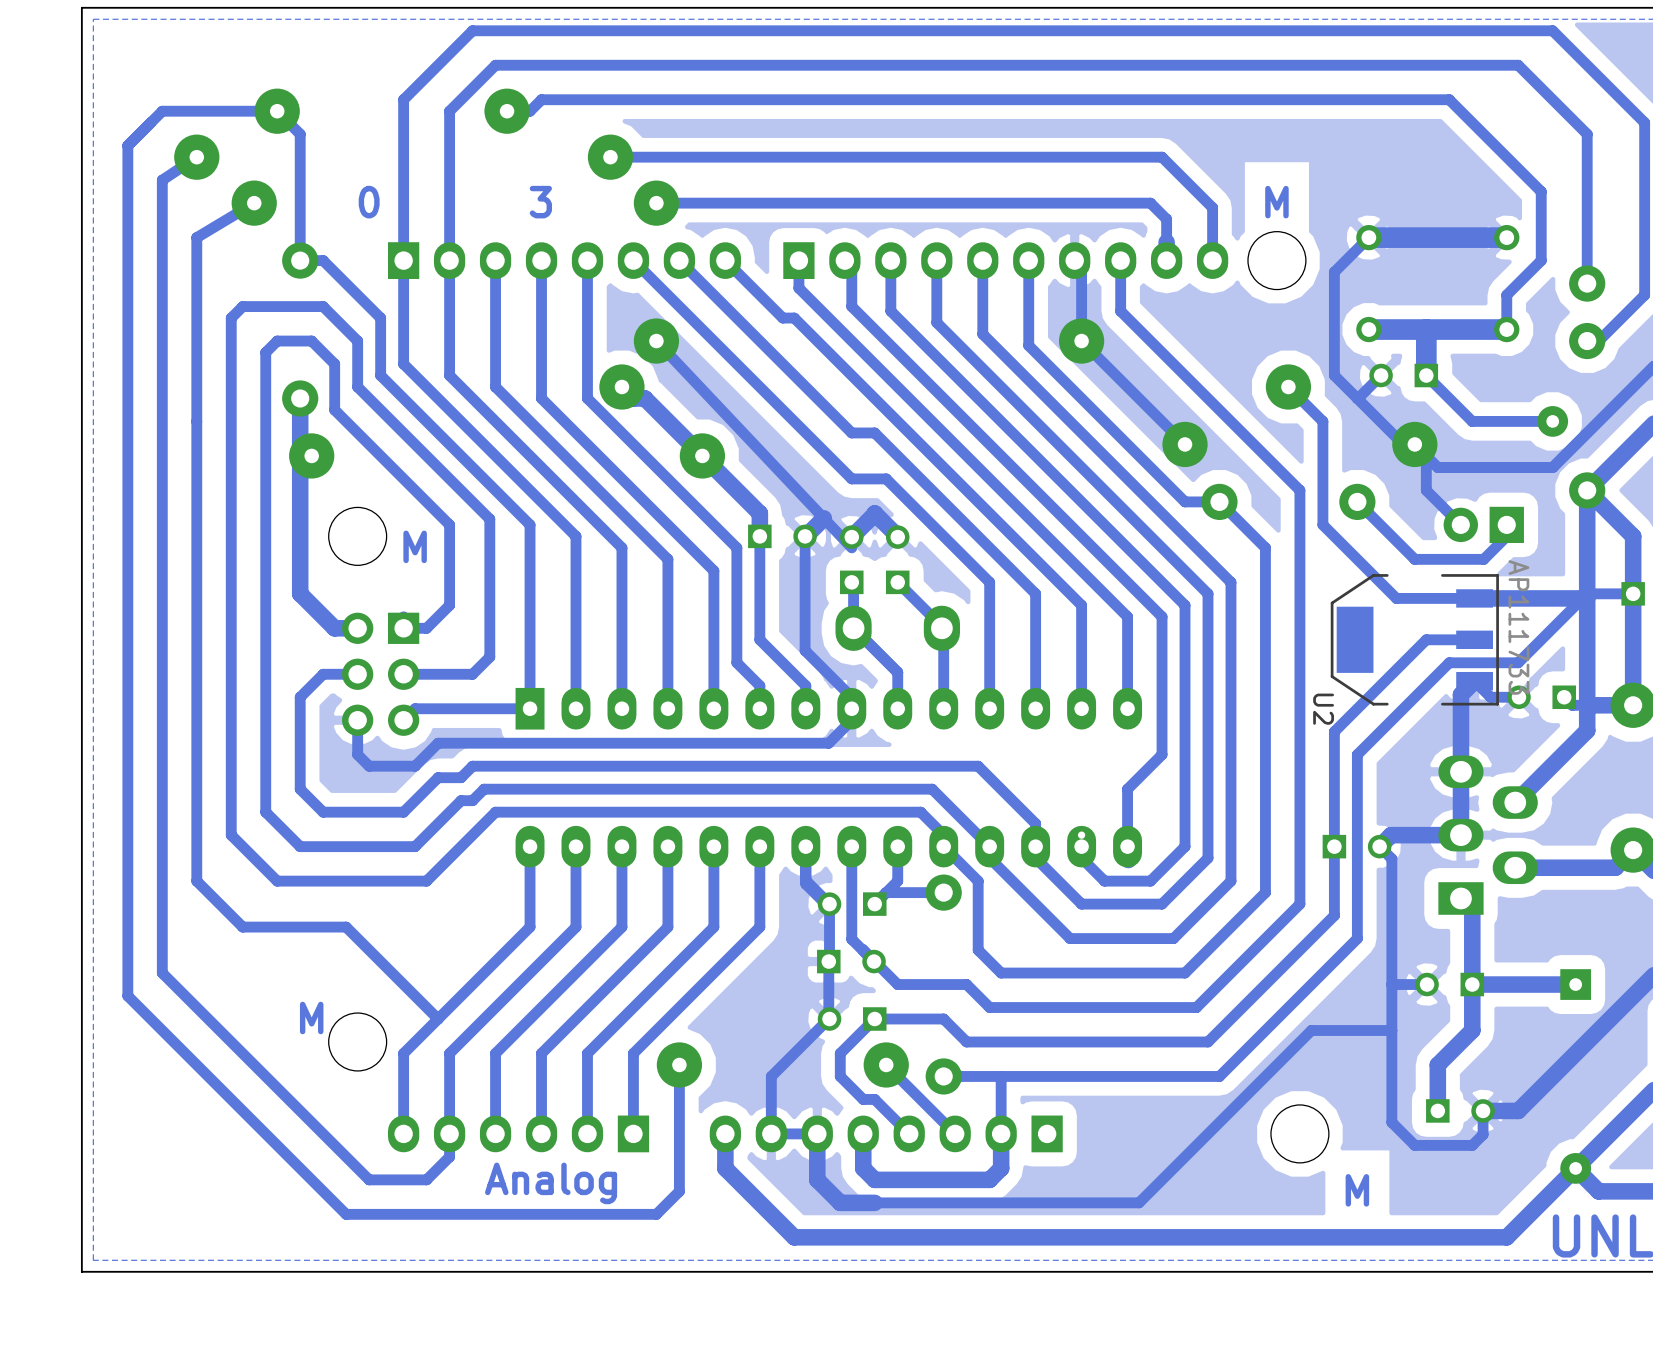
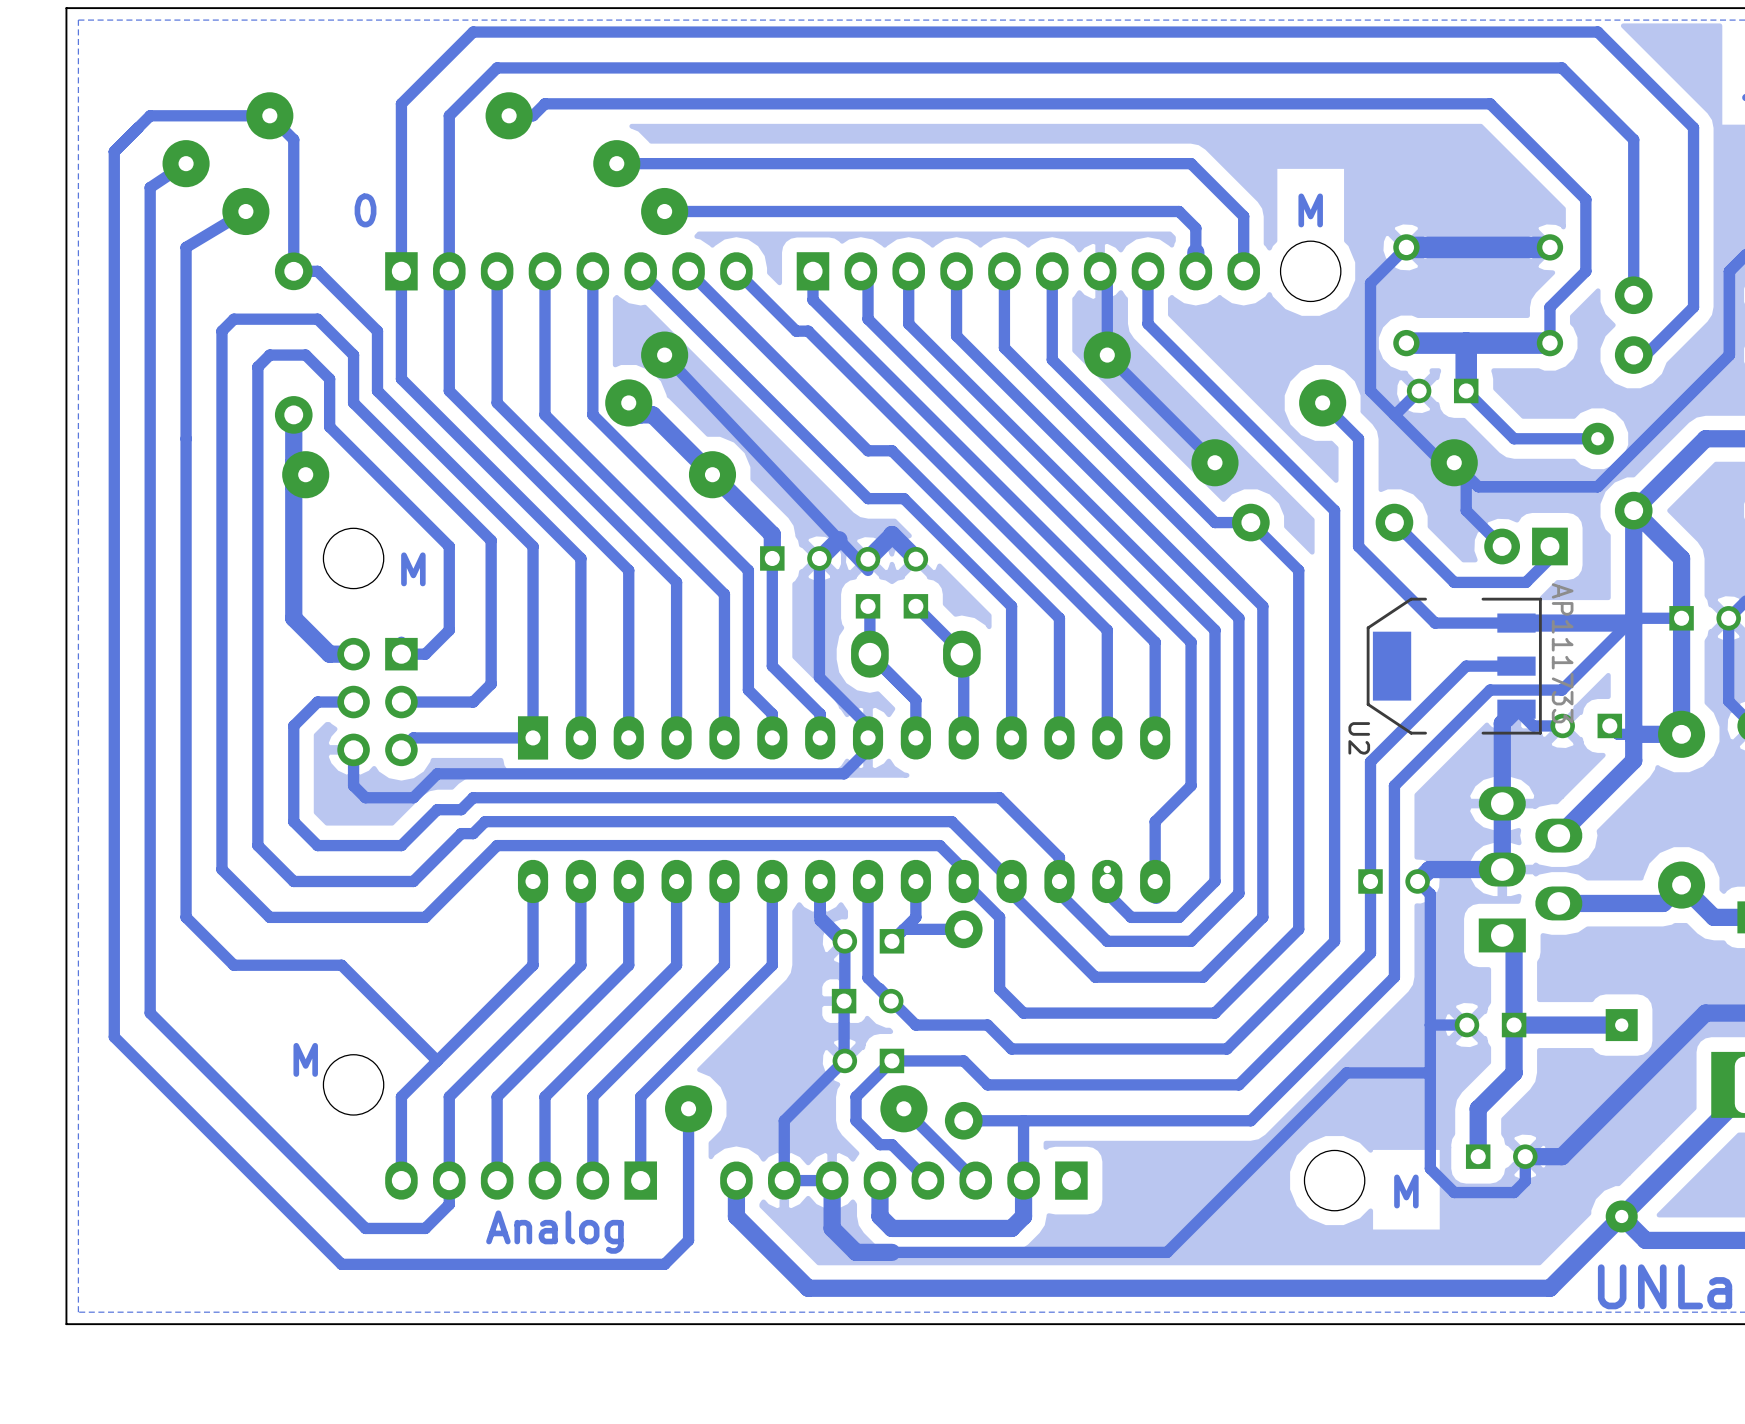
text: 3 (540, 202) -> none
text position: M (1357, 1190) -> M (1406, 1191)

